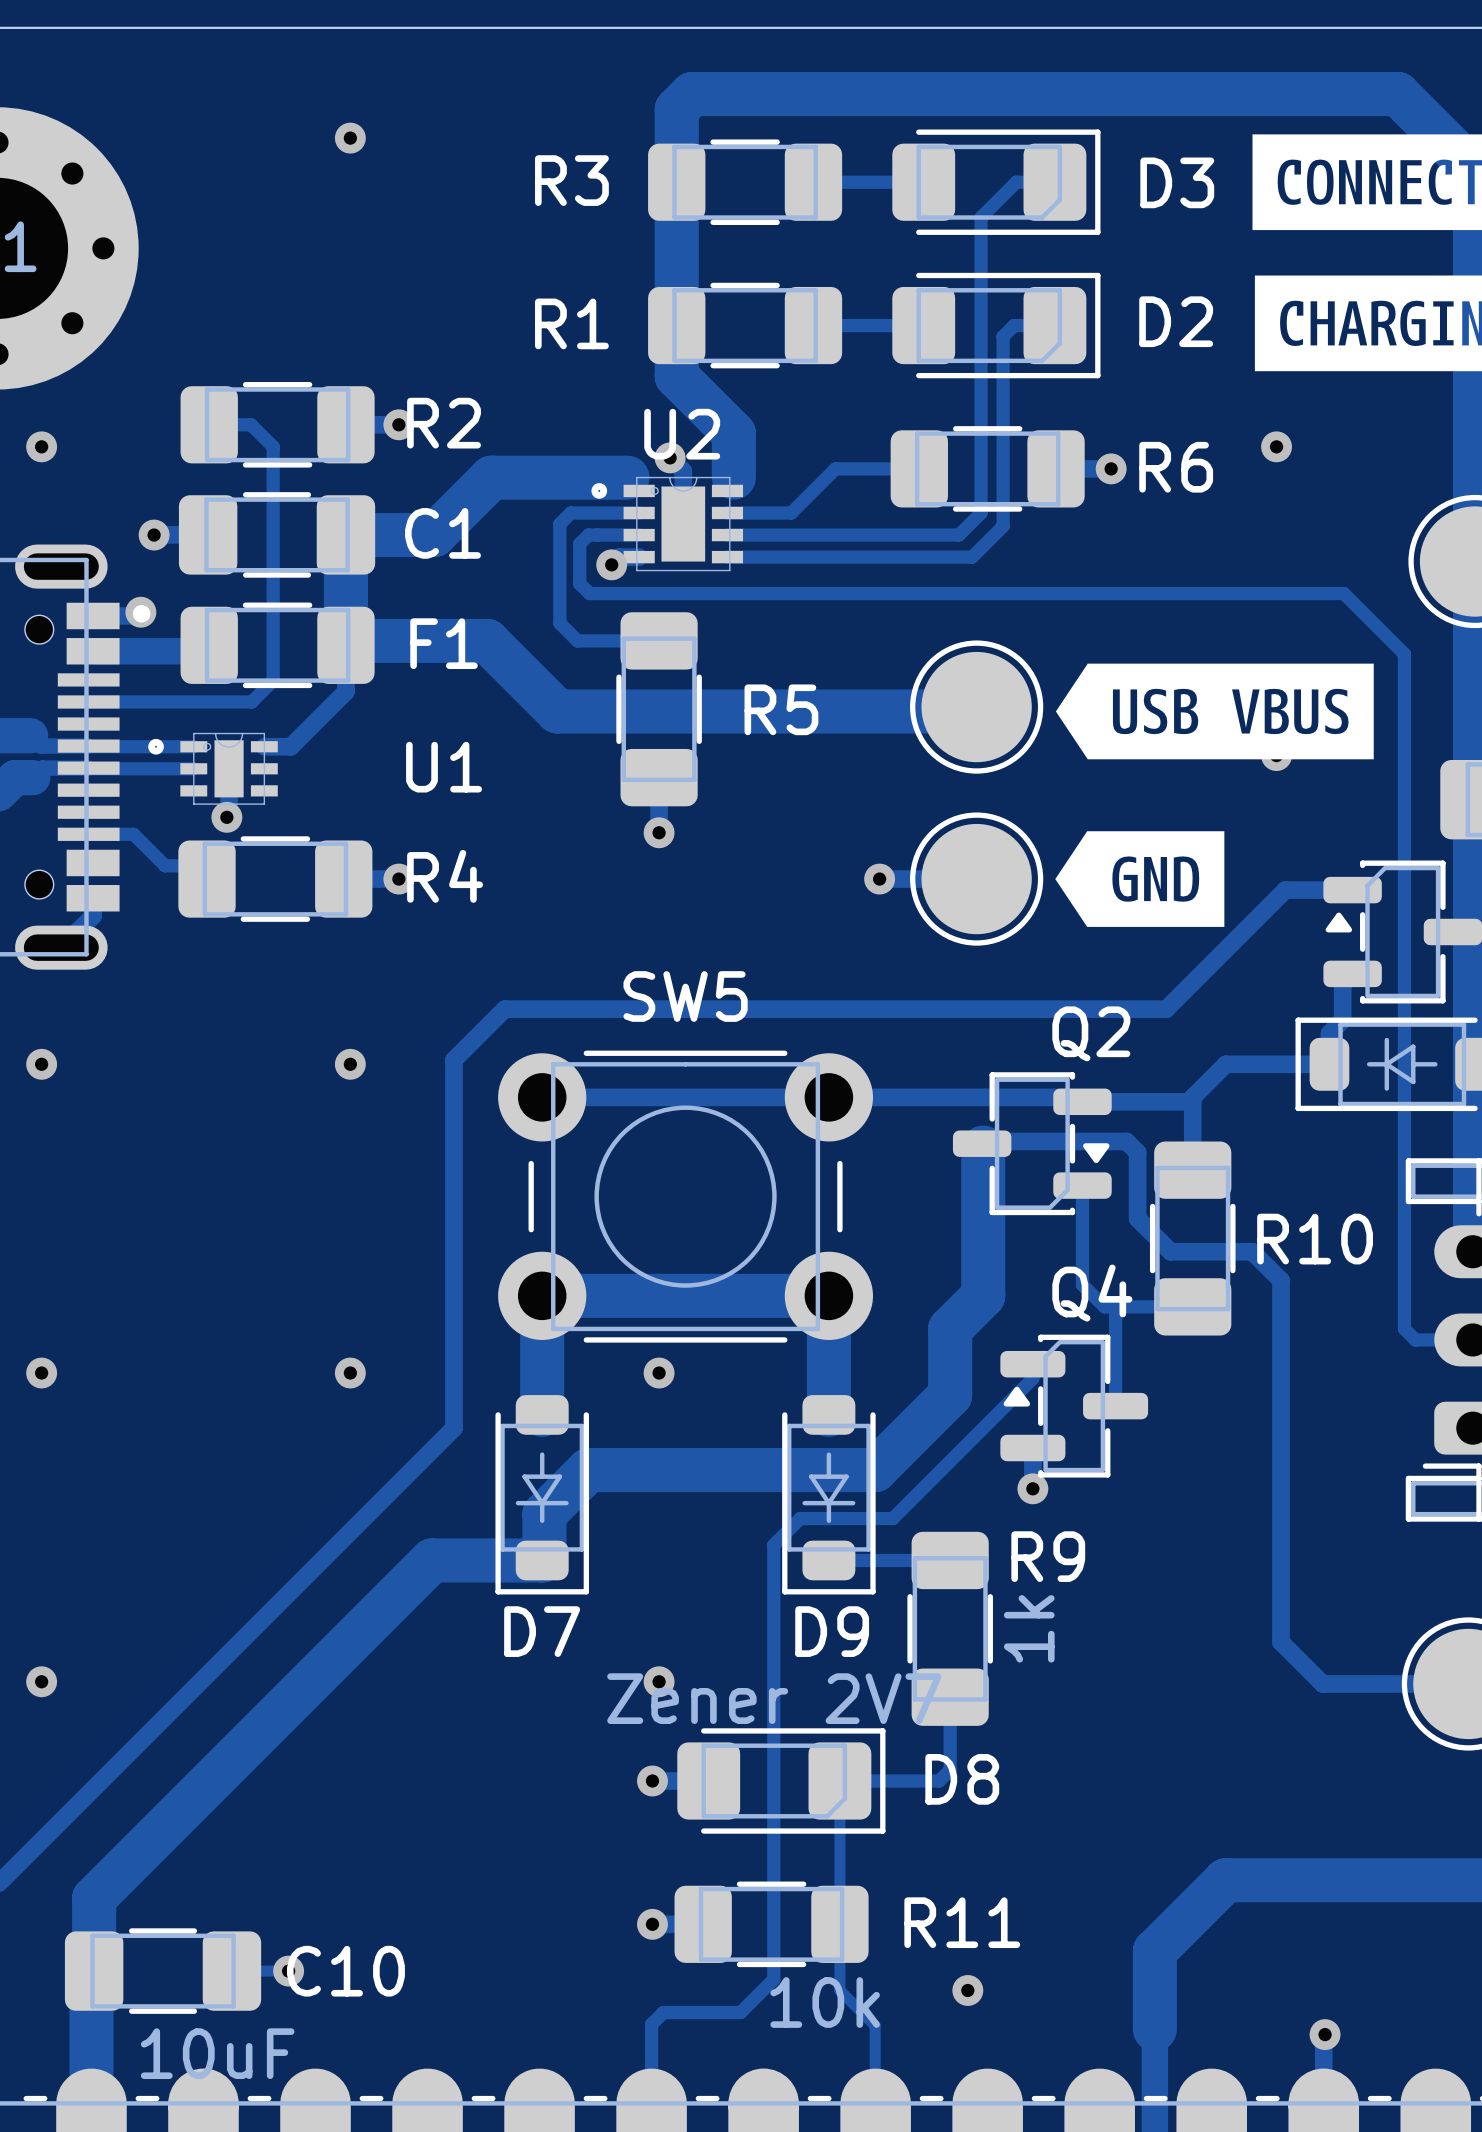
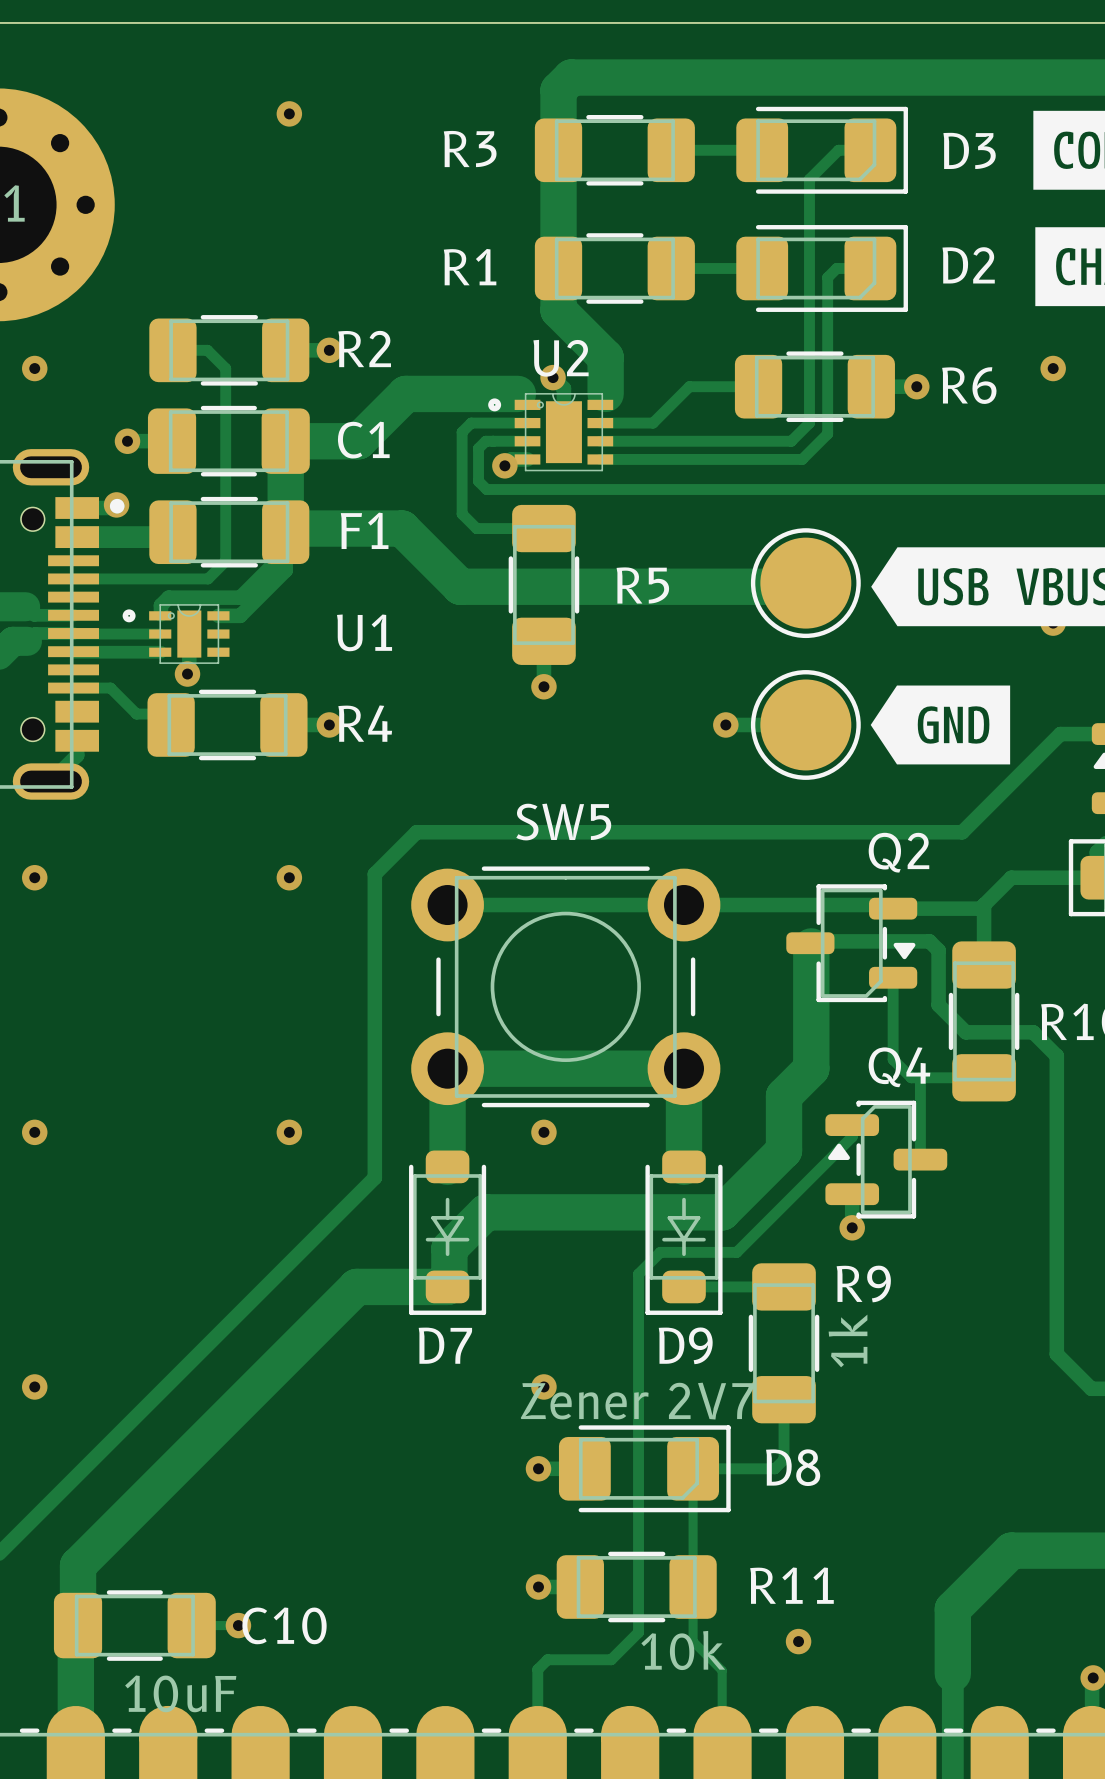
track: none -> (285, 552) (240, 597) (168, 597) (160, 605) (160, 614)
track: (88, 746) (193, 746) -> none
track: none -> (74, 652) (160, 652)

